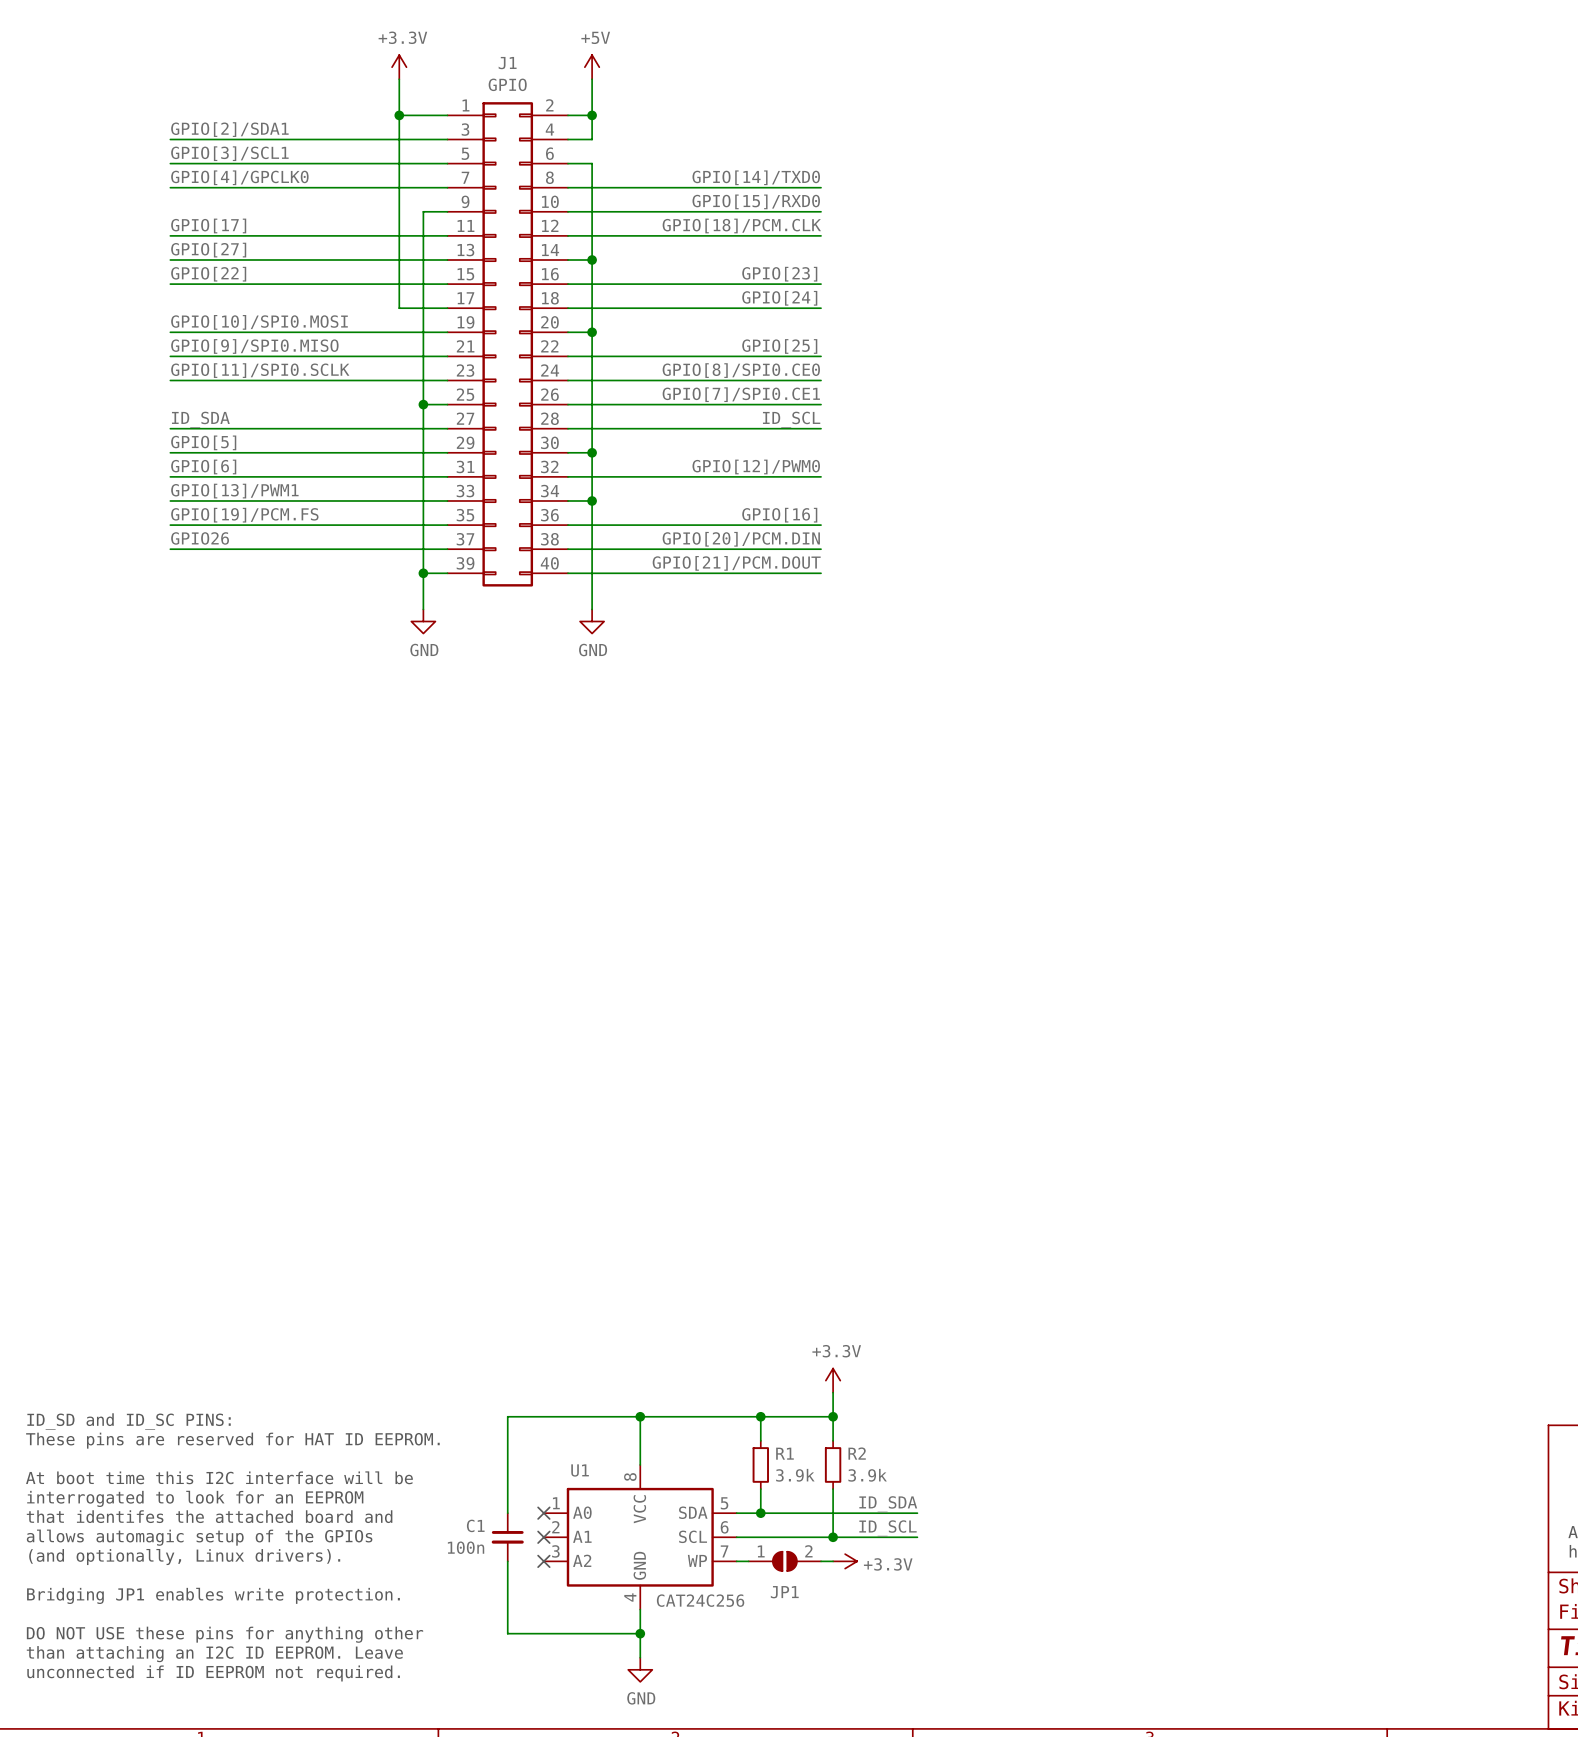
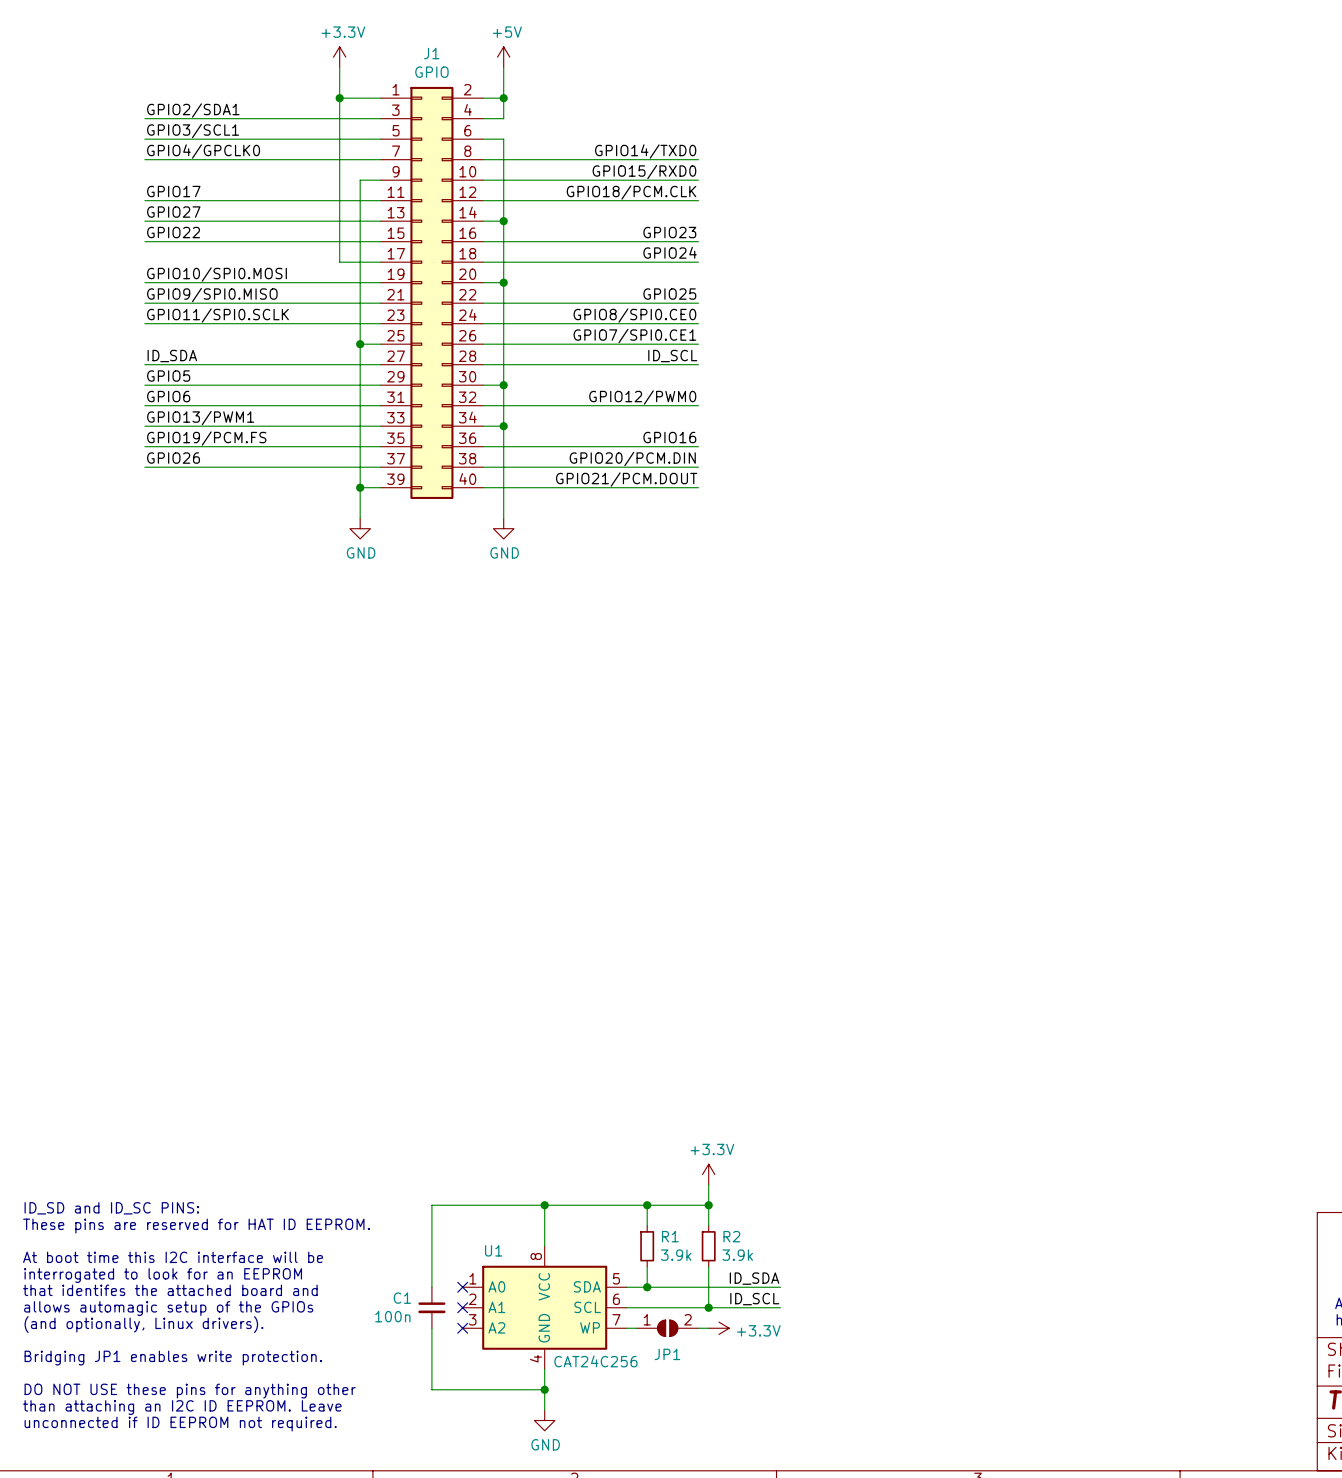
label: GPIO[2]/SDA1 (229, 129) -> GPIO2/SDA1 (193, 110)
label: GPIO[3]/SCL1 (229, 153) -> GPIO3/SCL1 (193, 131)
label: GPIO[4]/GPCLK0 (239, 177) -> GPIO4/GPCLK0 (203, 151)
label: GPIO[14]/TXD0 (756, 177) -> GPIO14/TXD0 (645, 151)
label: GPIO[15]/RXD0 (756, 201) -> GPIO15/RXD0 (644, 172)
label: GPIO[17] (208, 225) -> GPIO17 (173, 191)
label: GPIO[18]/PCM.CLK (741, 225) -> GPIO18/PCM.CLK (631, 192)
label: GPIO[27] (208, 250) -> GPIO27 (173, 212)
label: GPIO[22] (208, 274) -> GPIO22 (173, 232)
label: GPIO[23] (779, 274) -> GPIO23 (669, 232)
label: GPIO[24] (779, 298) -> GPIO24 (670, 252)
label: GPIO[10]/SPI0.MOSI (259, 322) -> GPIO10/SPI0.MOSI (216, 274)
label: GPIO[9]/SPI0.MISO (254, 346) -> GPIO9/SPI0.MISO (212, 295)
label: GPIO[25] (779, 346) -> GPIO25 (669, 294)
label: GPIO[11]/SPI0.SCLK (260, 370) -> GPIO11/SPI0.SCLK (217, 315)
label: GPIO[8]/SPI0.CE0 (741, 370) -> GPIO8/SPI0.CE0 (634, 315)
label: GPIO[7]/SPI0.CE1 (741, 394) -> GPIO7/SPI0.CE1 (634, 336)
label: GPIO[5] (203, 442) -> GPIO5 (168, 376)
label: GPIO[6] (203, 466) -> GPIO6 (168, 396)
label: GPIO[12]/PWM0 (756, 466) -> GPIO12/PWM0 (642, 397)
label: GPIO[13]/PWM1 (234, 491) -> GPIO13/PWM1 (200, 418)
label: GPIO[19]/PCM.FS (244, 515) -> GPIO19/PCM.FS (206, 438)
label: GPIO[16] (779, 515) -> GPIO16 (669, 437)
label: GPIO[20]/PCM.DIN (741, 539) -> GPIO20/PCM.DIN (632, 459)
label: GPIO[21]/PCM.DOUT (736, 563) -> GPIO21/PCM.DOUT (626, 479)

